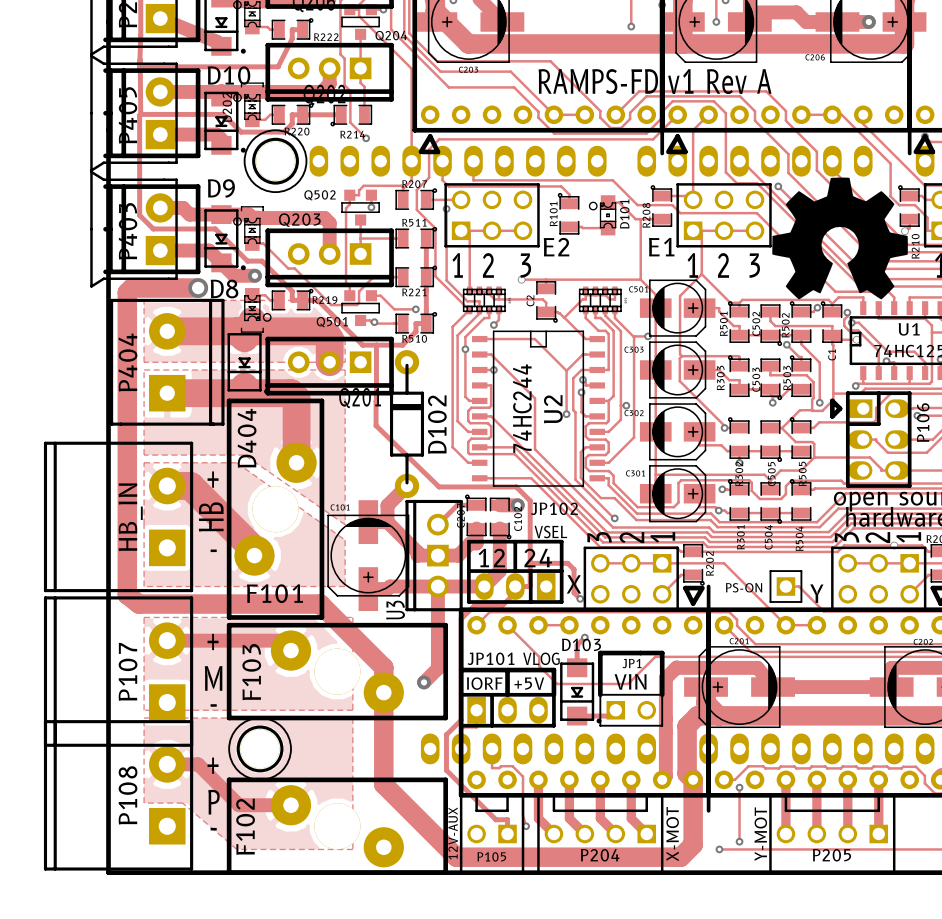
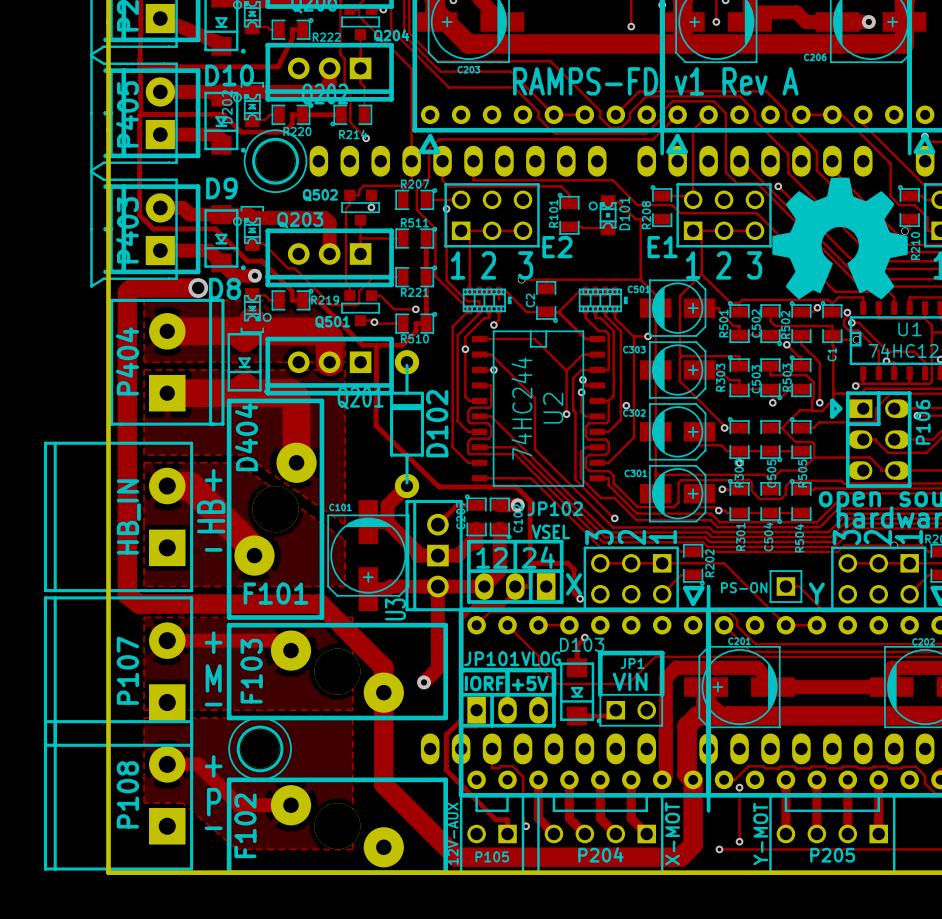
track: (489, 291) (489, 293) (494, 299) (542, 299) (546, 302) (546, 311) -> (469, 291) (505, 291) (526, 312) (545, 312)
track: (585, 291) (585, 299) (582, 299) (564, 317) -> none
track: (614, 291) (614, 299) (609, 299) (605, 294) -> (614, 291) (579, 291) (558, 311) (585, 339)

